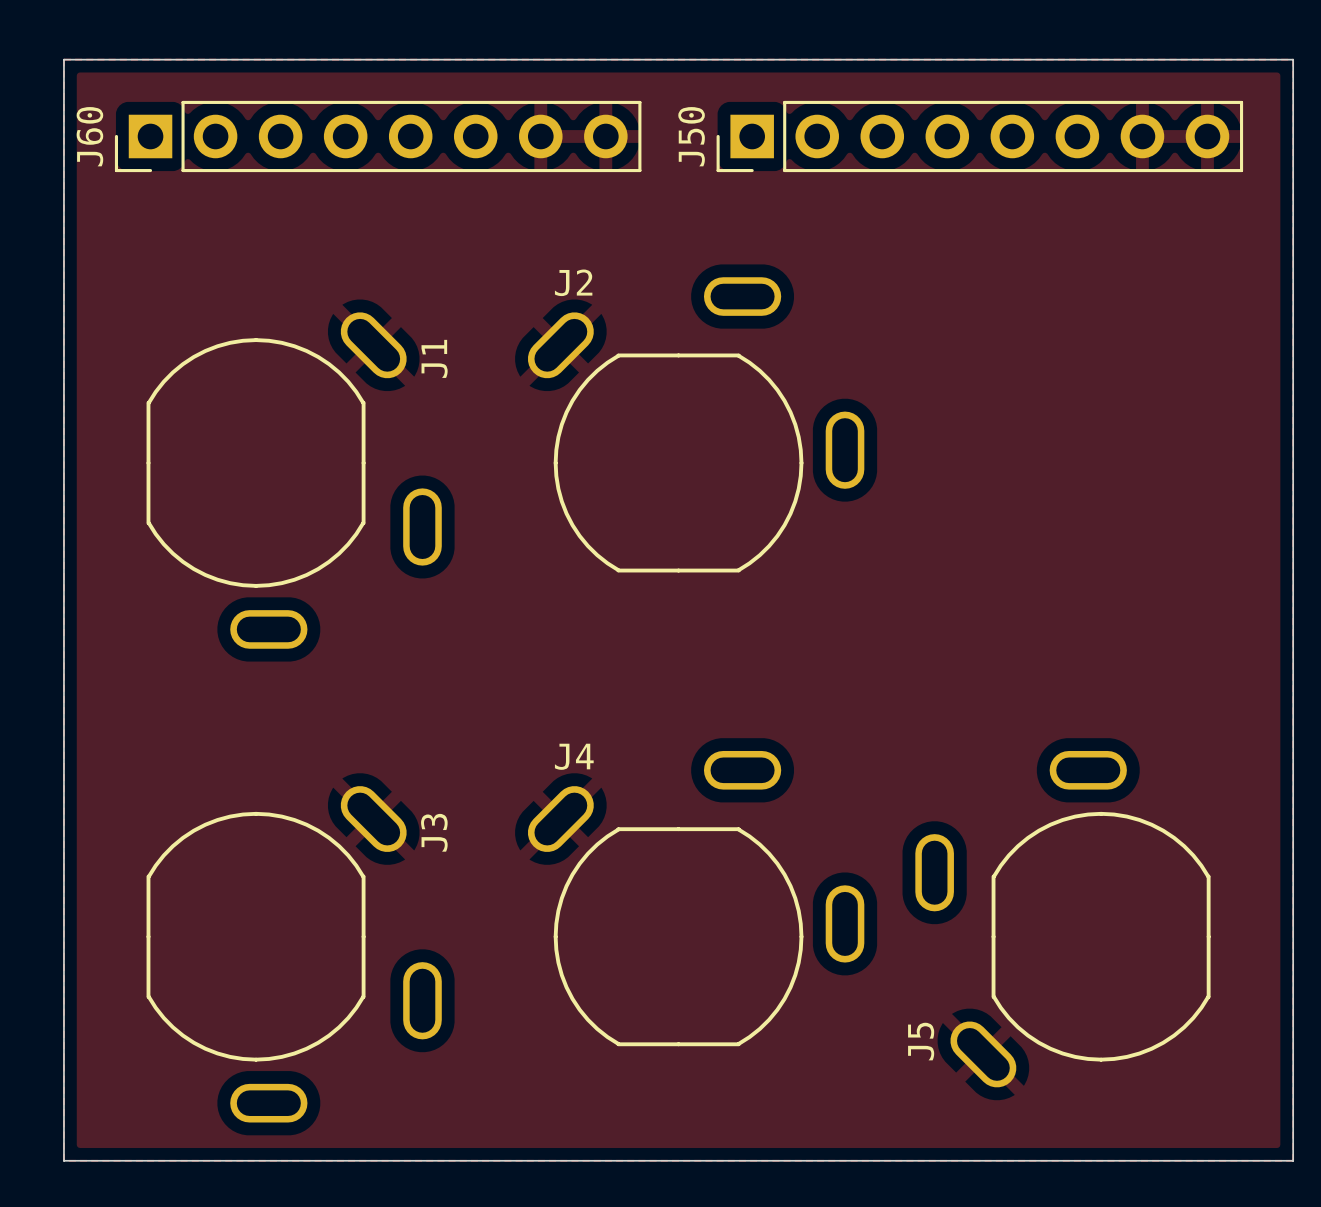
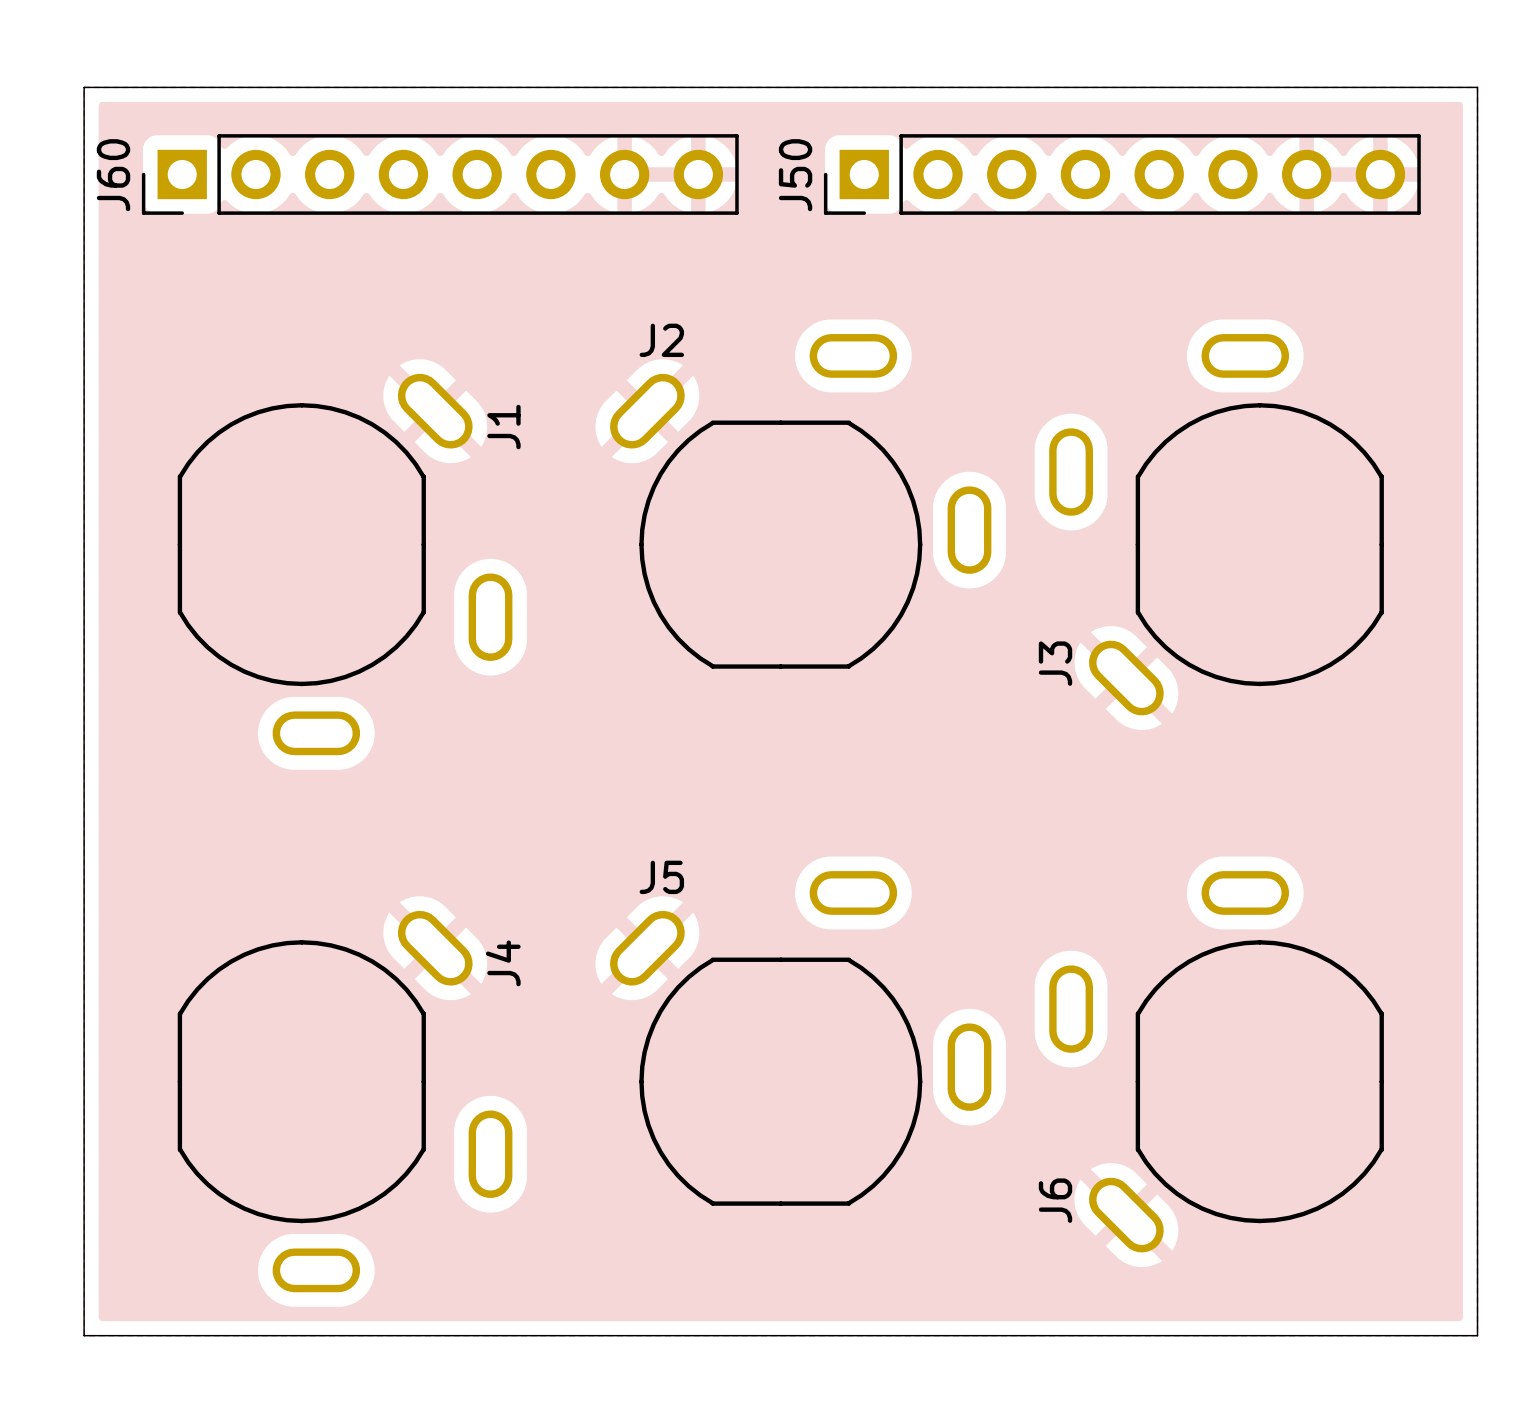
J3: none -> (1216, 524)
J4 name: J4 (574, 756) -> J5 (661, 877)
J3 name: J3 (434, 832) -> J4 (503, 963)
J5 name: J5 (921, 1041) -> J6 (1055, 1200)

